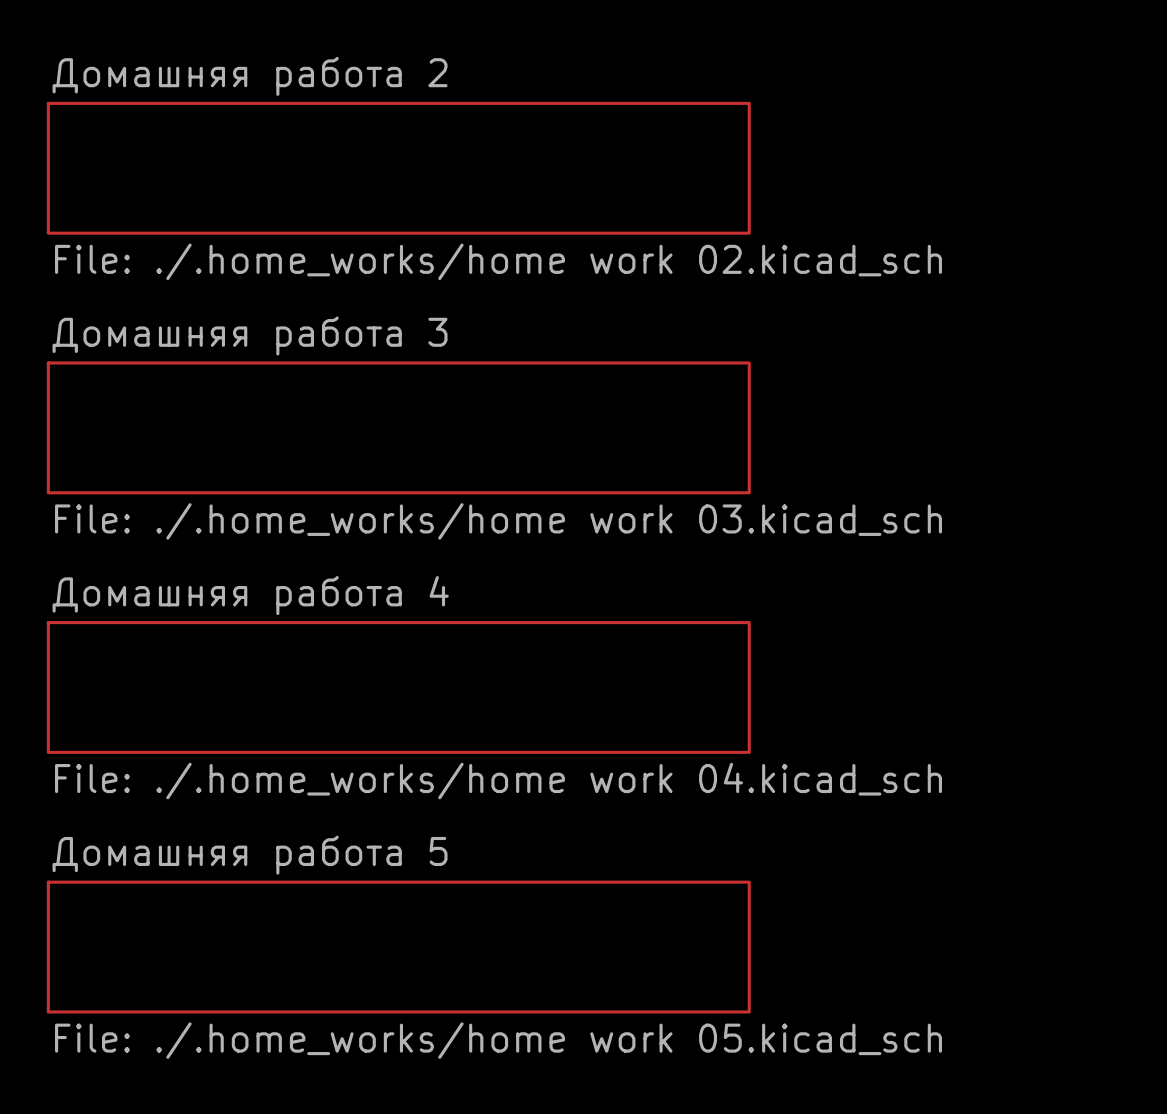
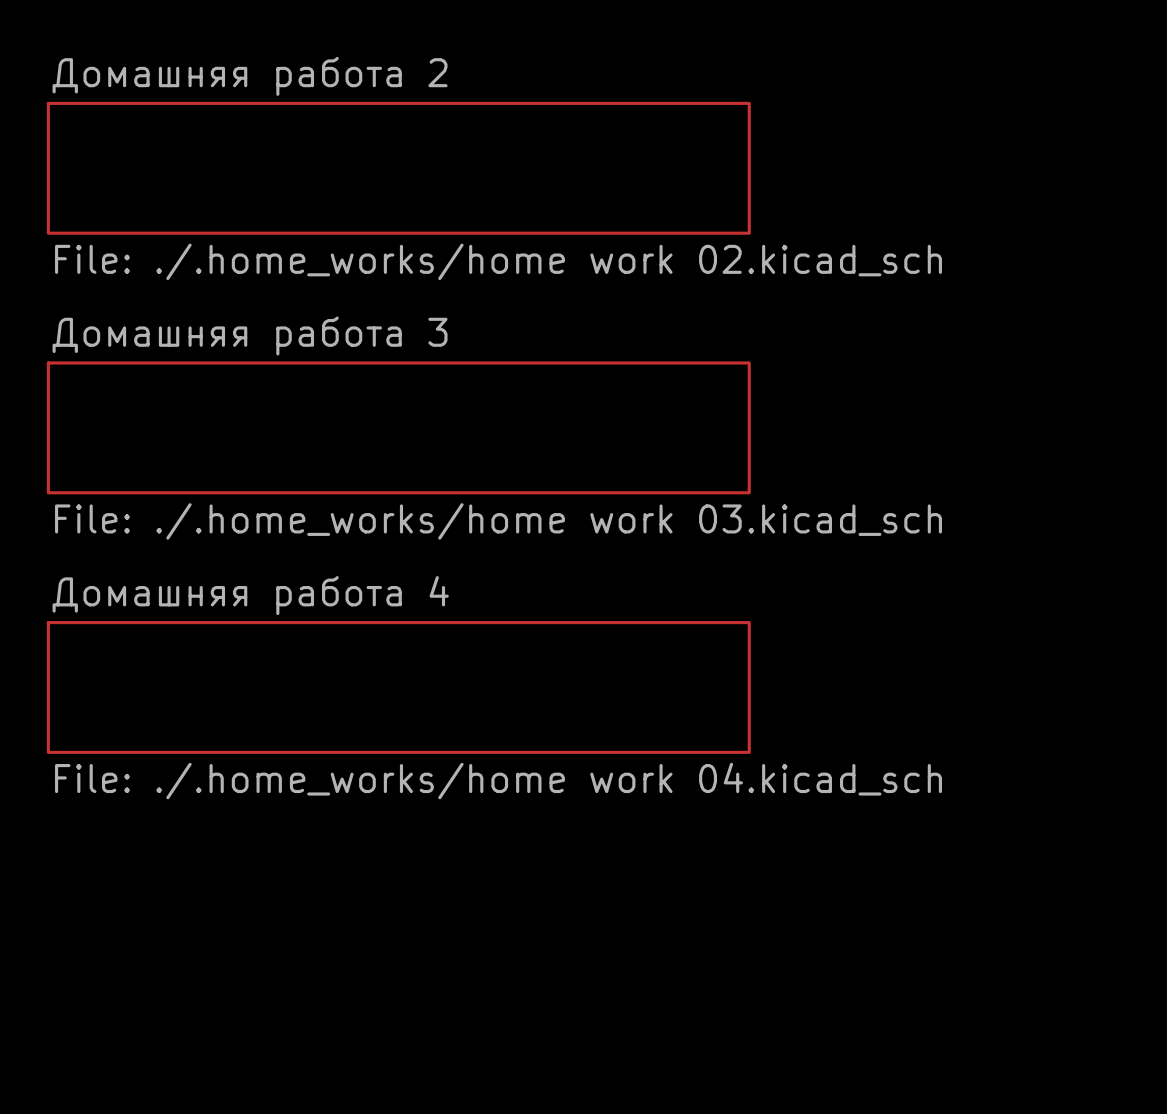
sheet Домашняя работа 5: File: ./.home_works/home work 05.kicad_sch (398, 947) -> none

